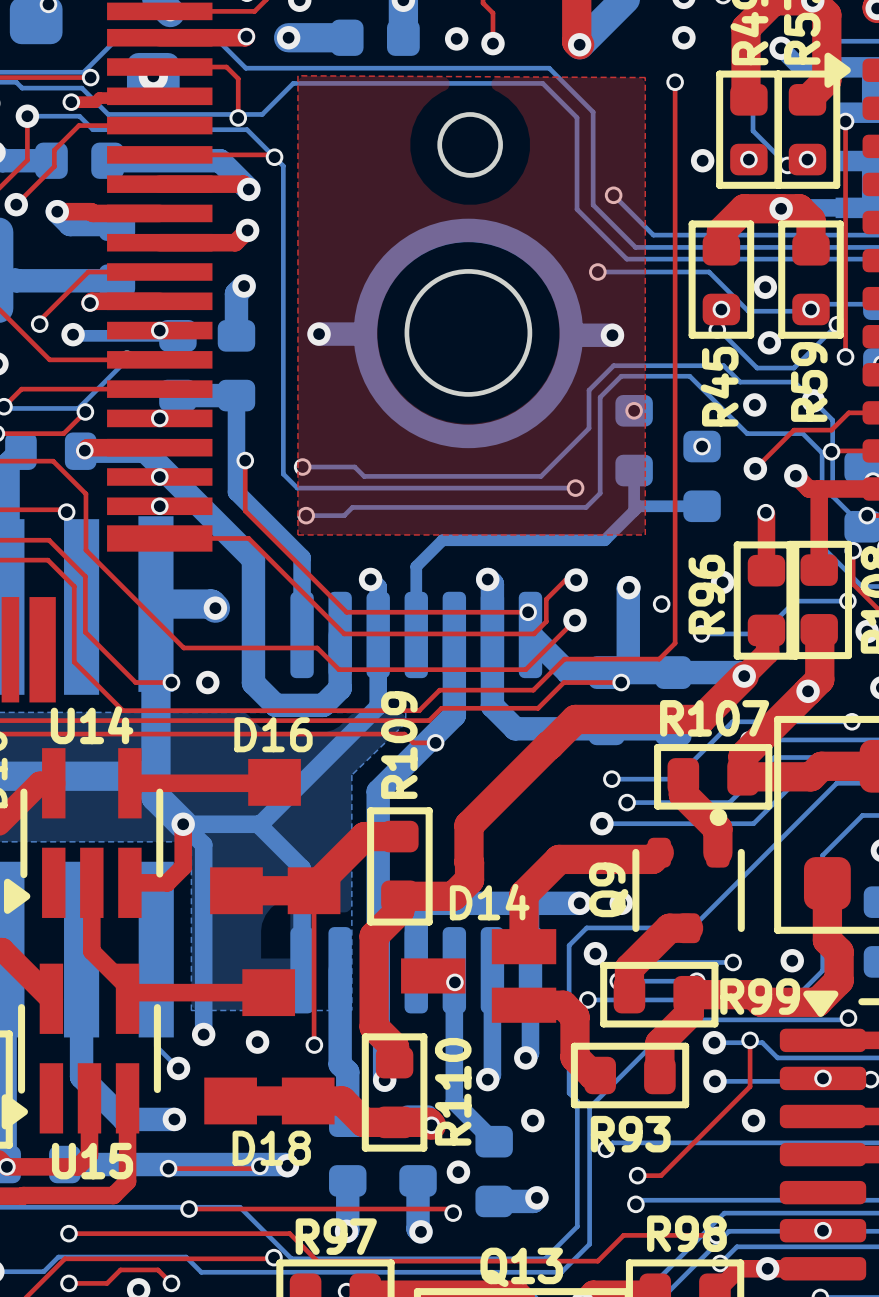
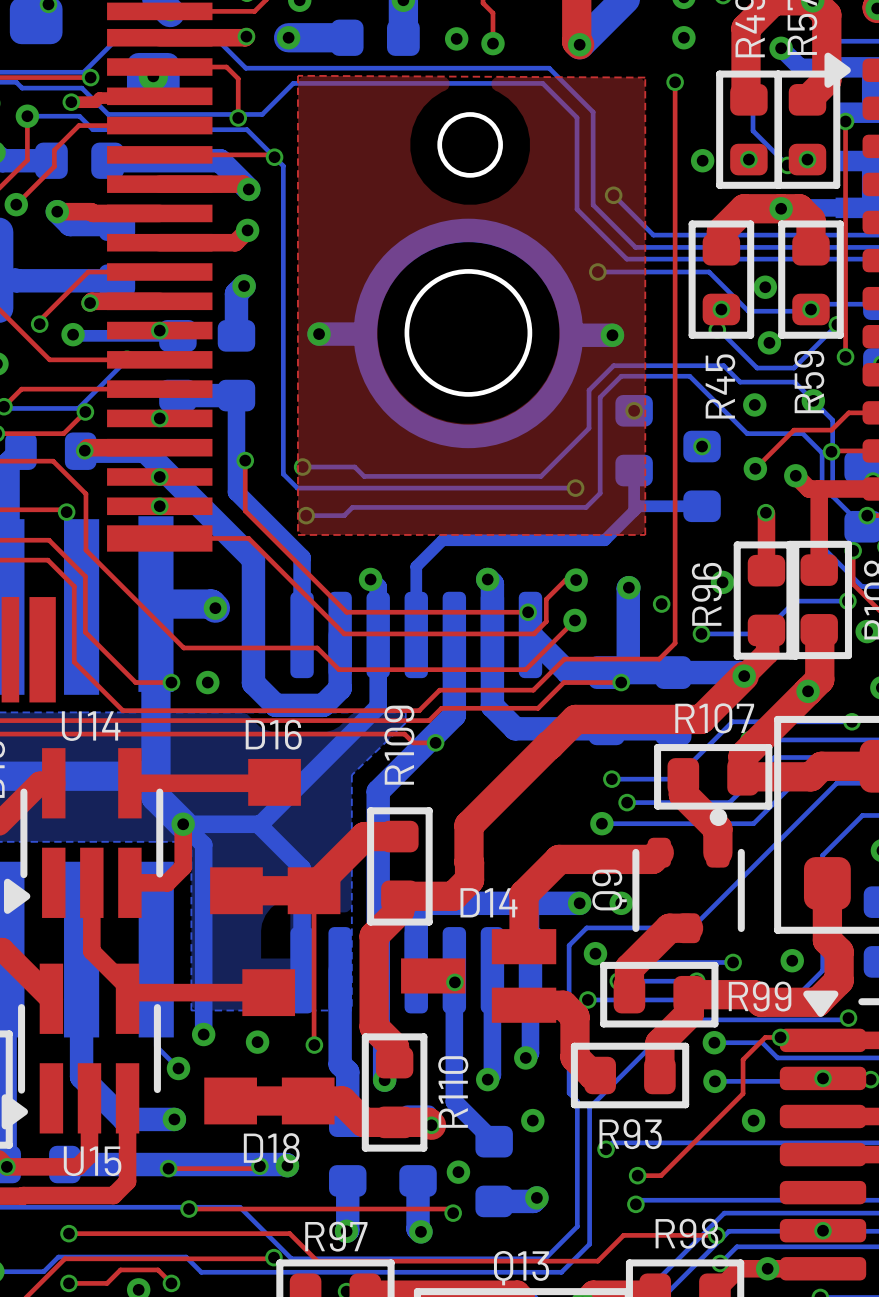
top track: (750, 1040) (750, 1086) (743, 1093) -> (820, 1037) (765, 1037) (743, 1059) (743, 1093)
via position: (750, 1040) -> (780, 1037)

